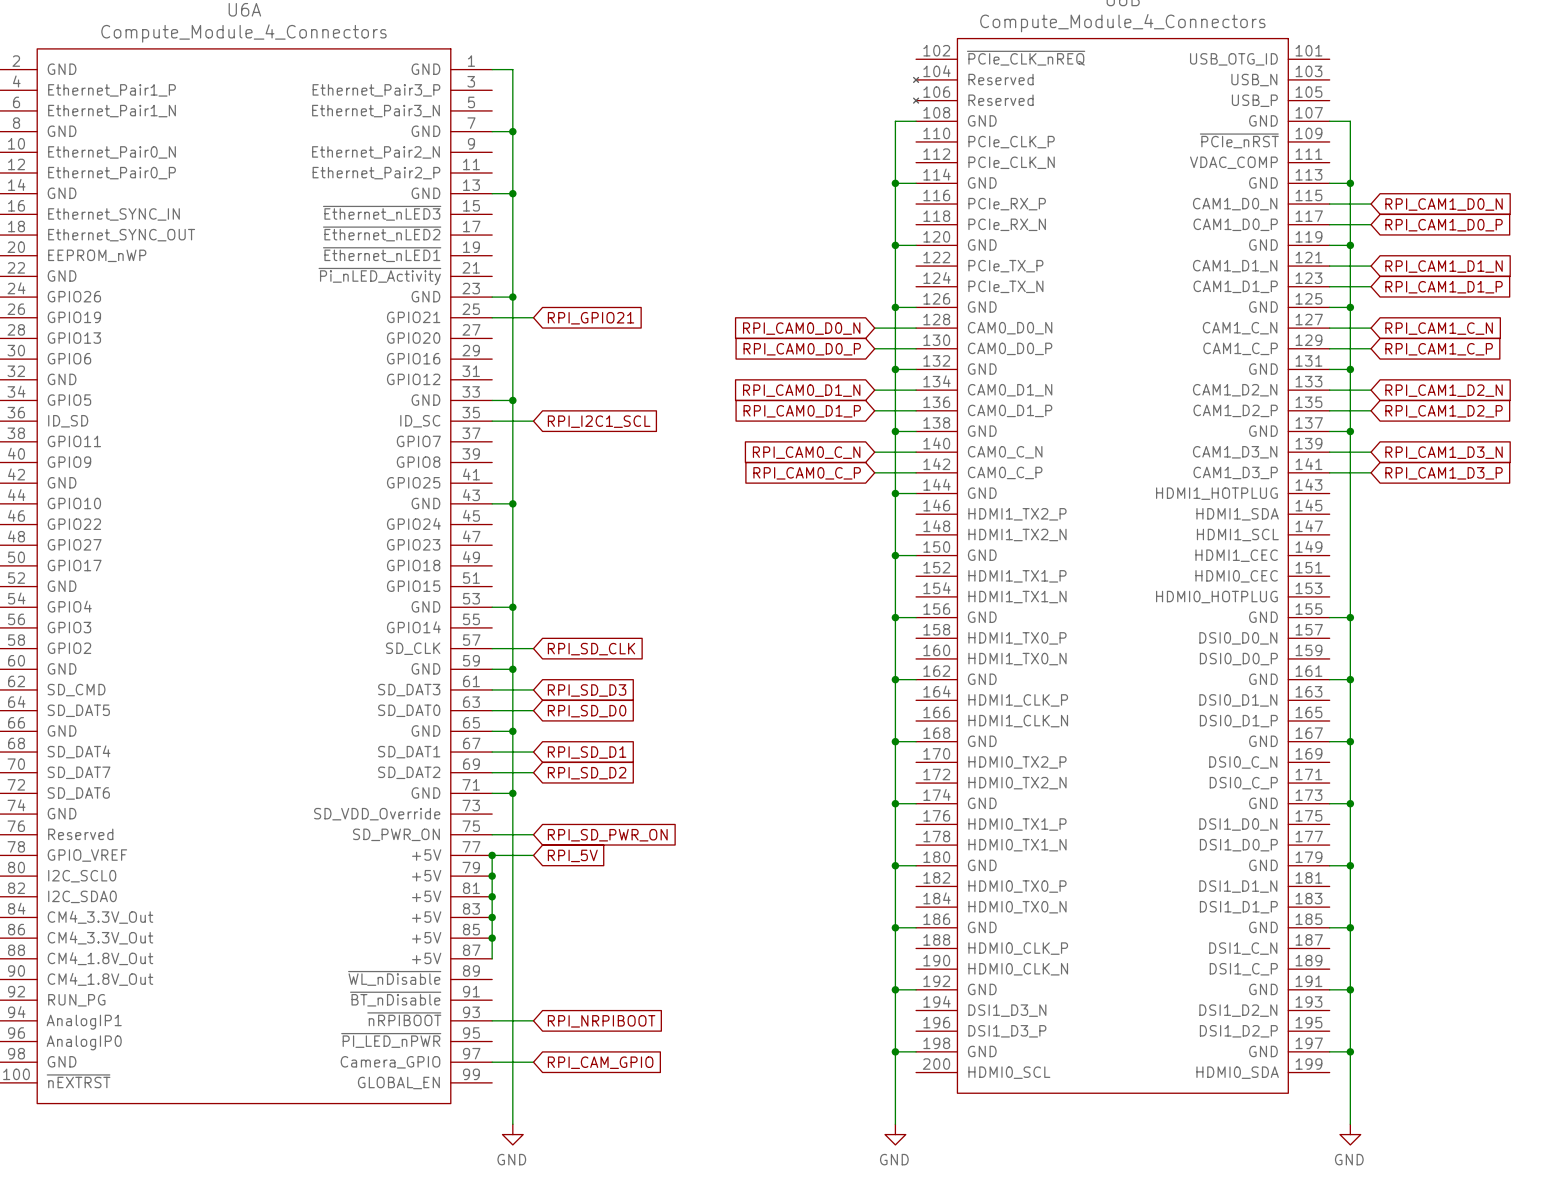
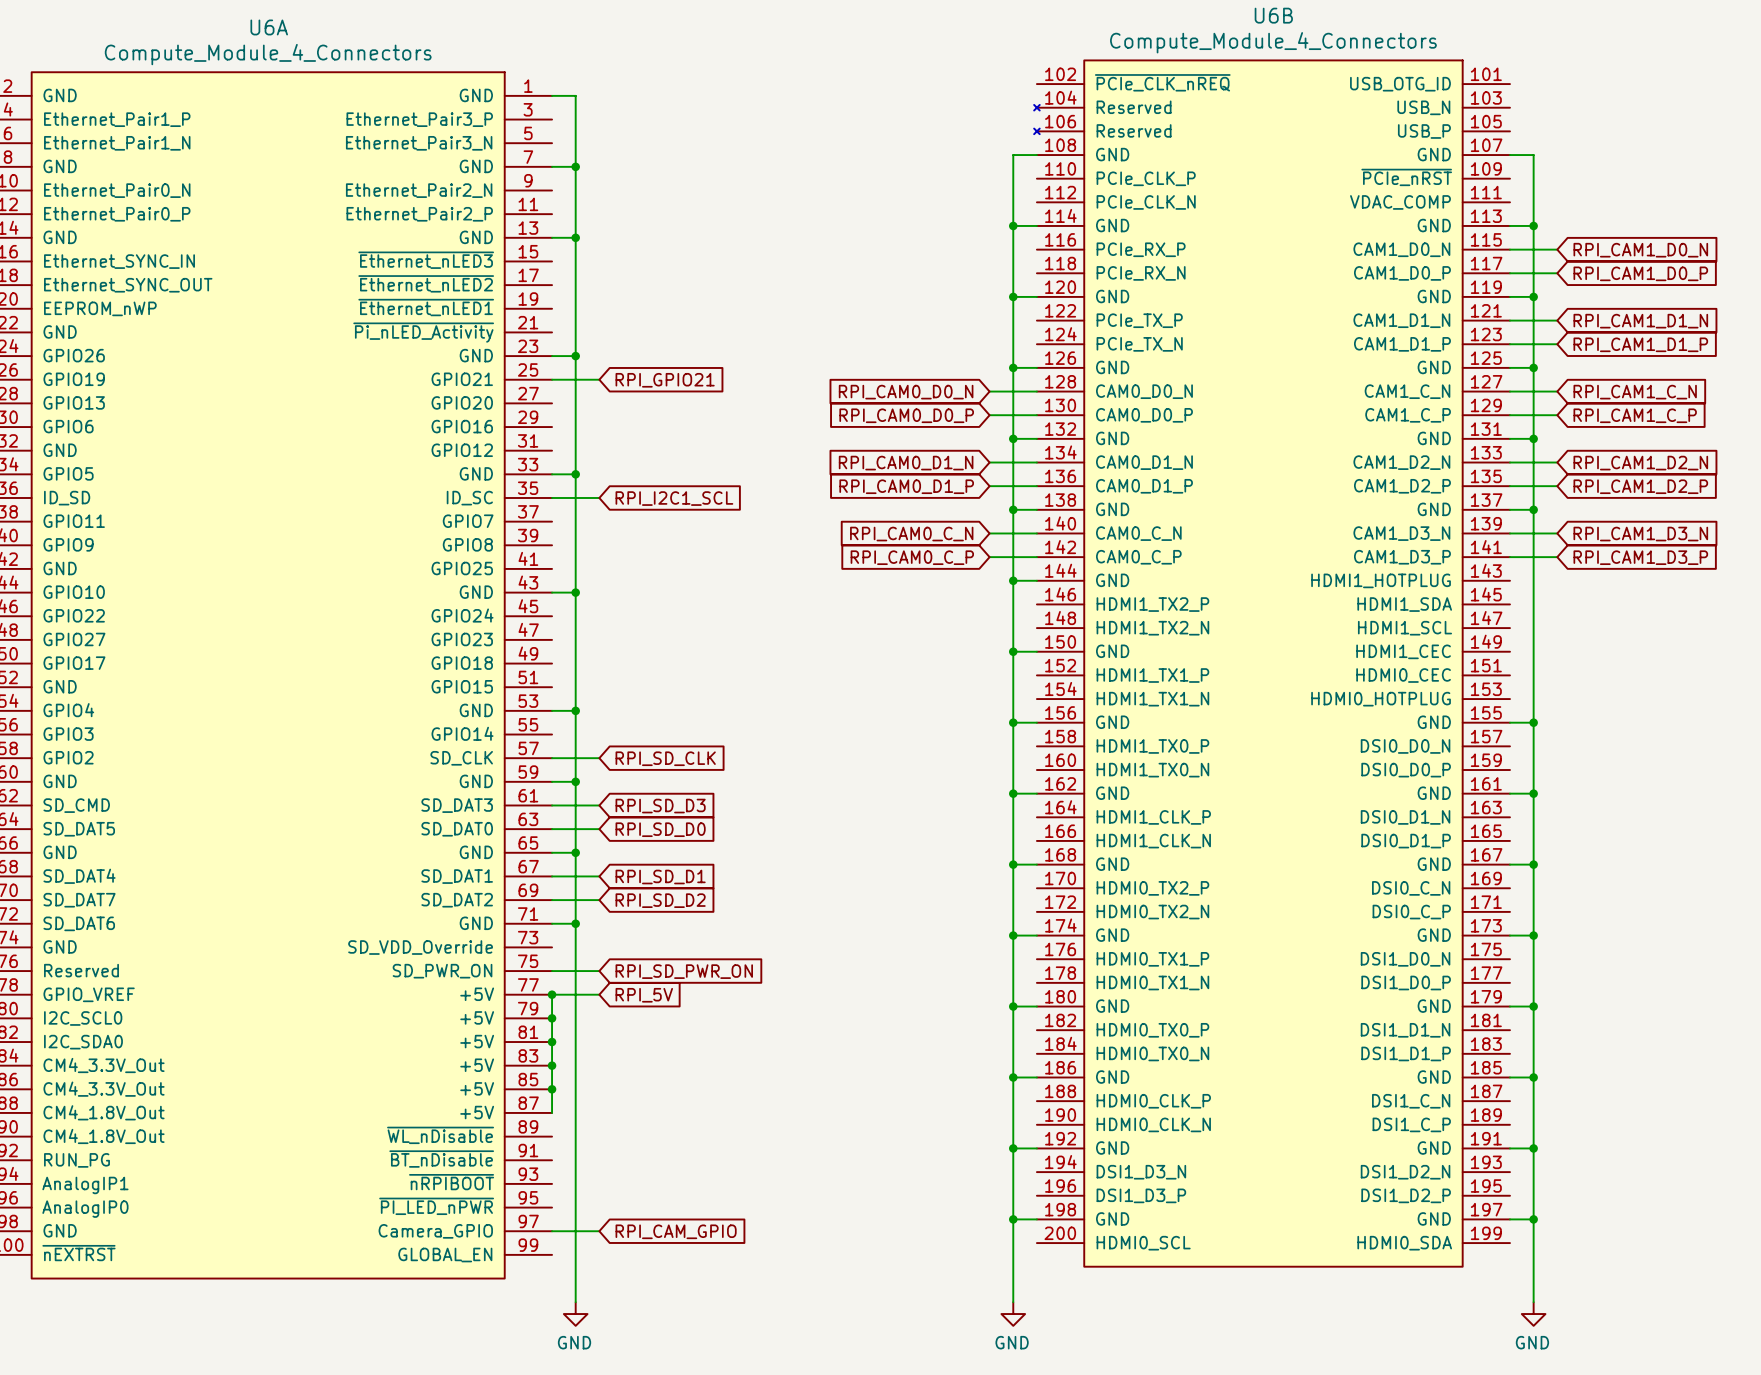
wire: (492, 1020) (533, 1020) -> none
global label: RPI_NRPIBOOT (601, 1021) -> none

